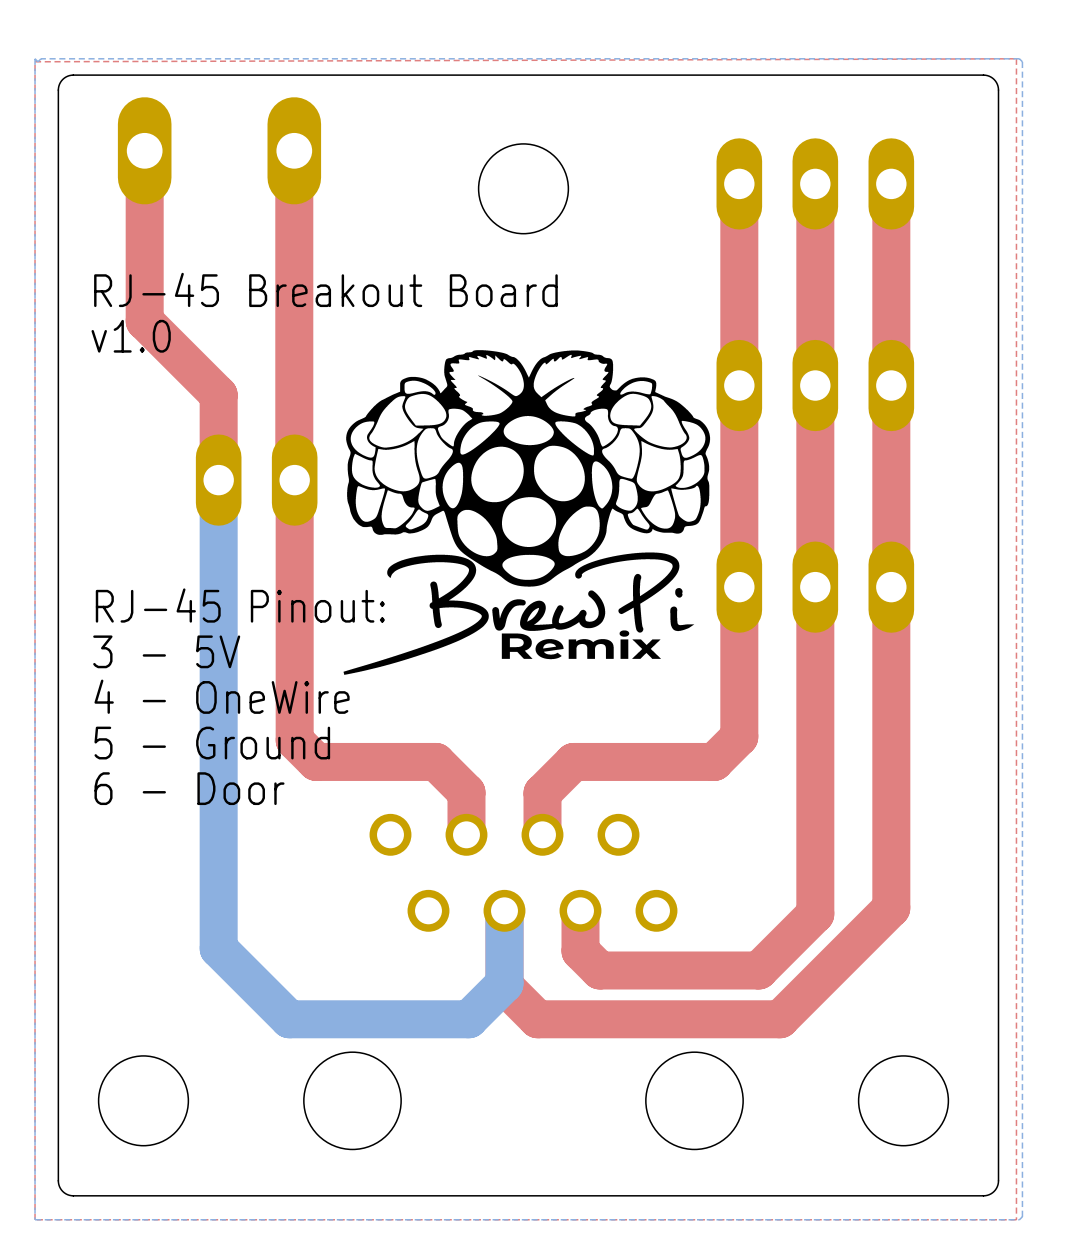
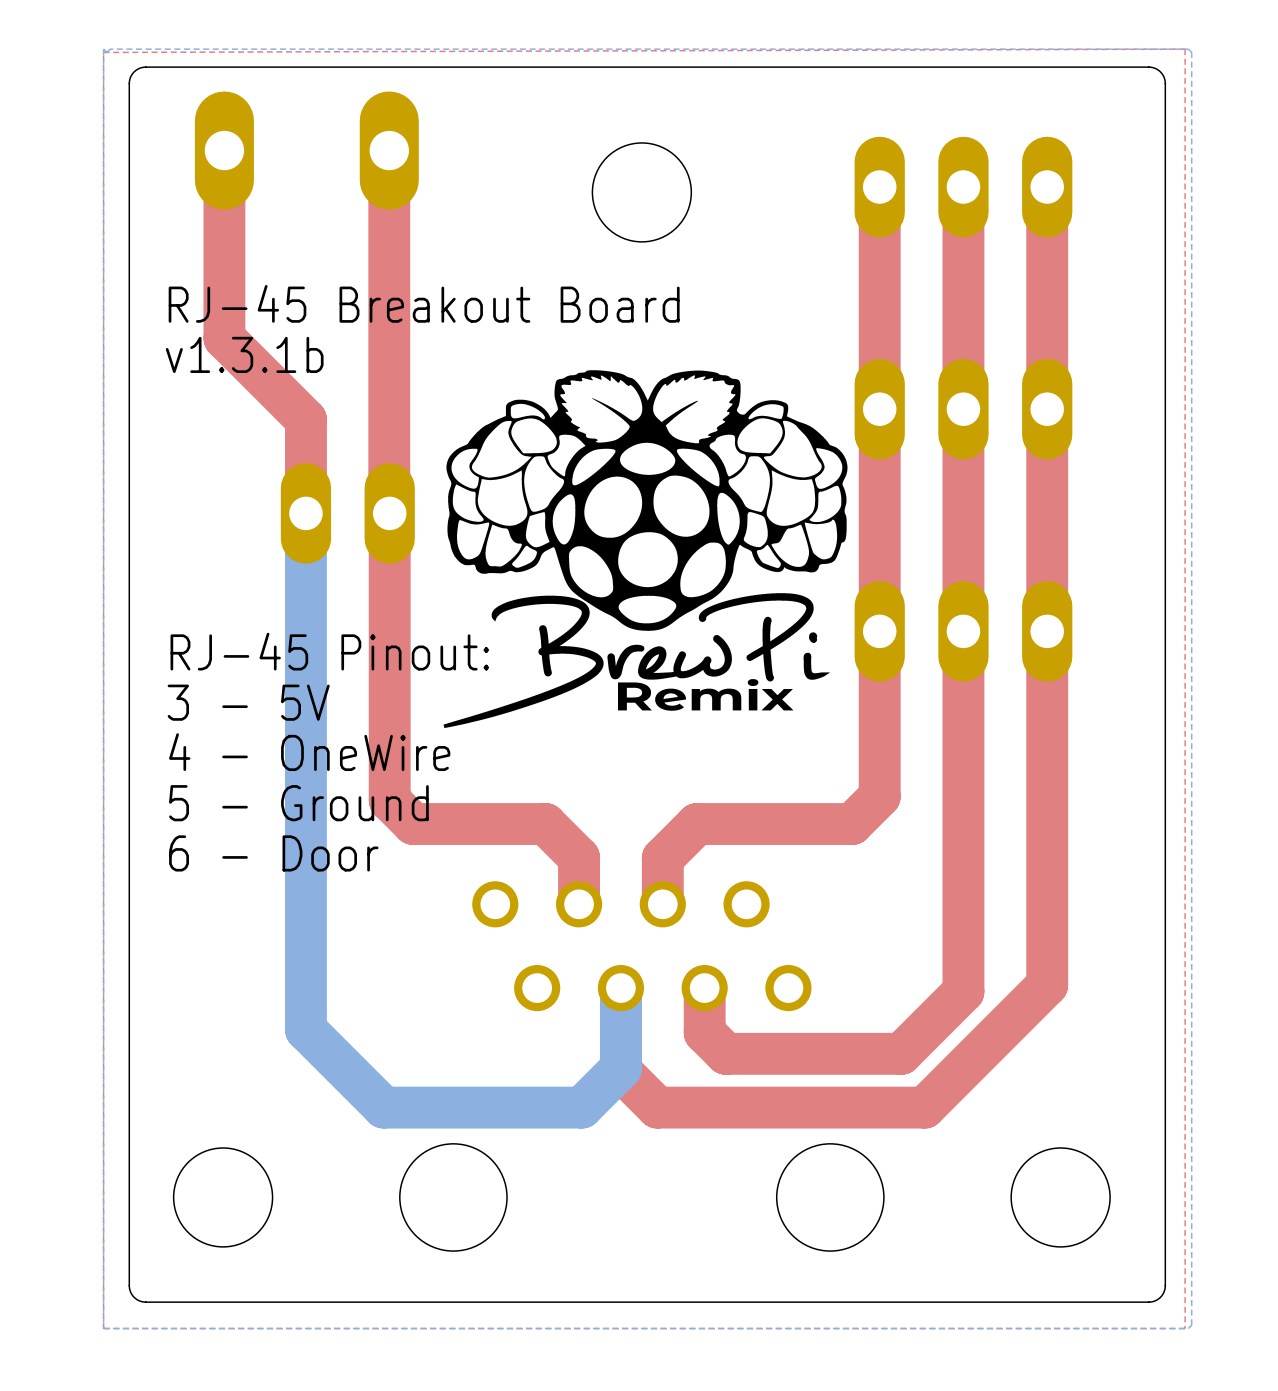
text: v1.0 (131, 336) -> v1.3.1b (244, 354)

